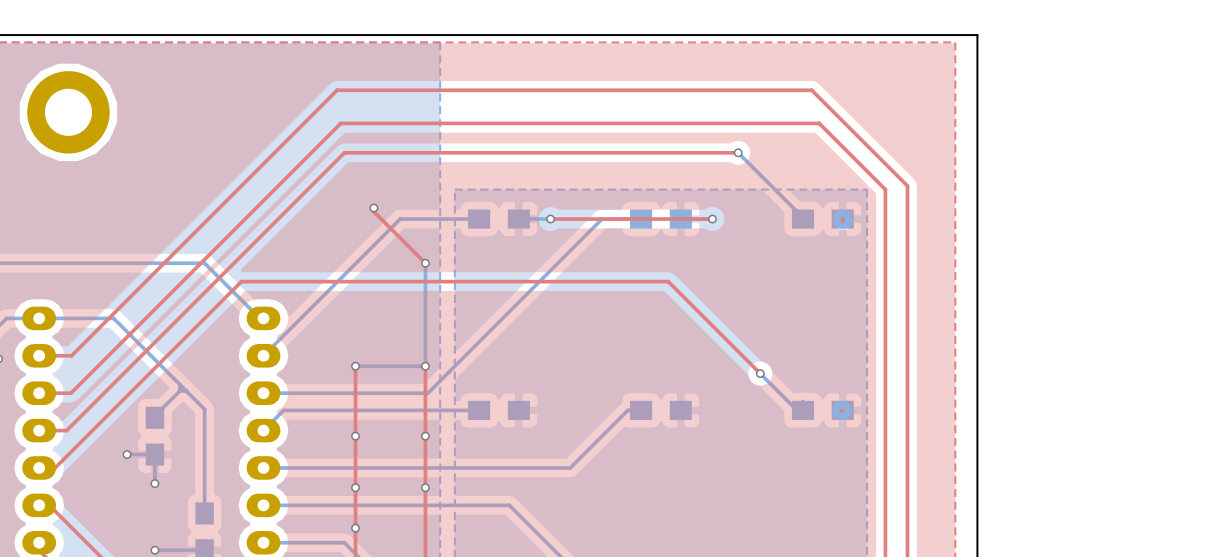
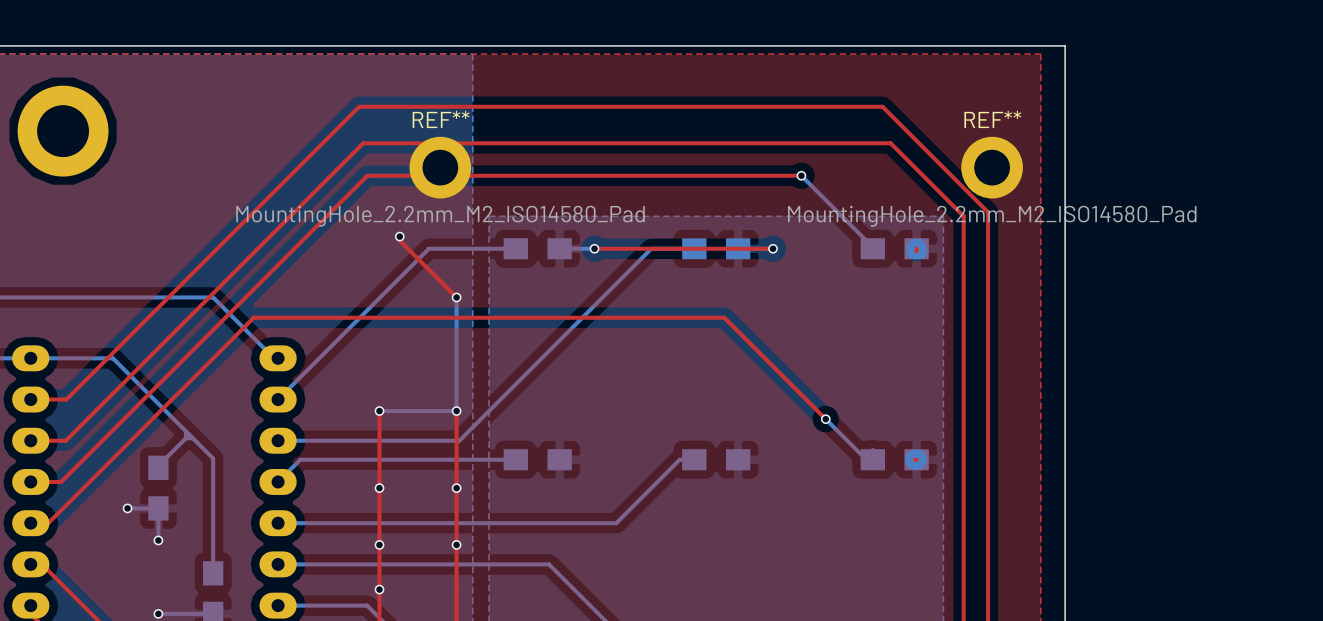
REF**: none -> MountingHole_2.2mm_M2_ISO14580_Pad (440, 167)
REF**: none -> MountingHole_2.2mm_M2_ISO14580_Pad (992, 167)

